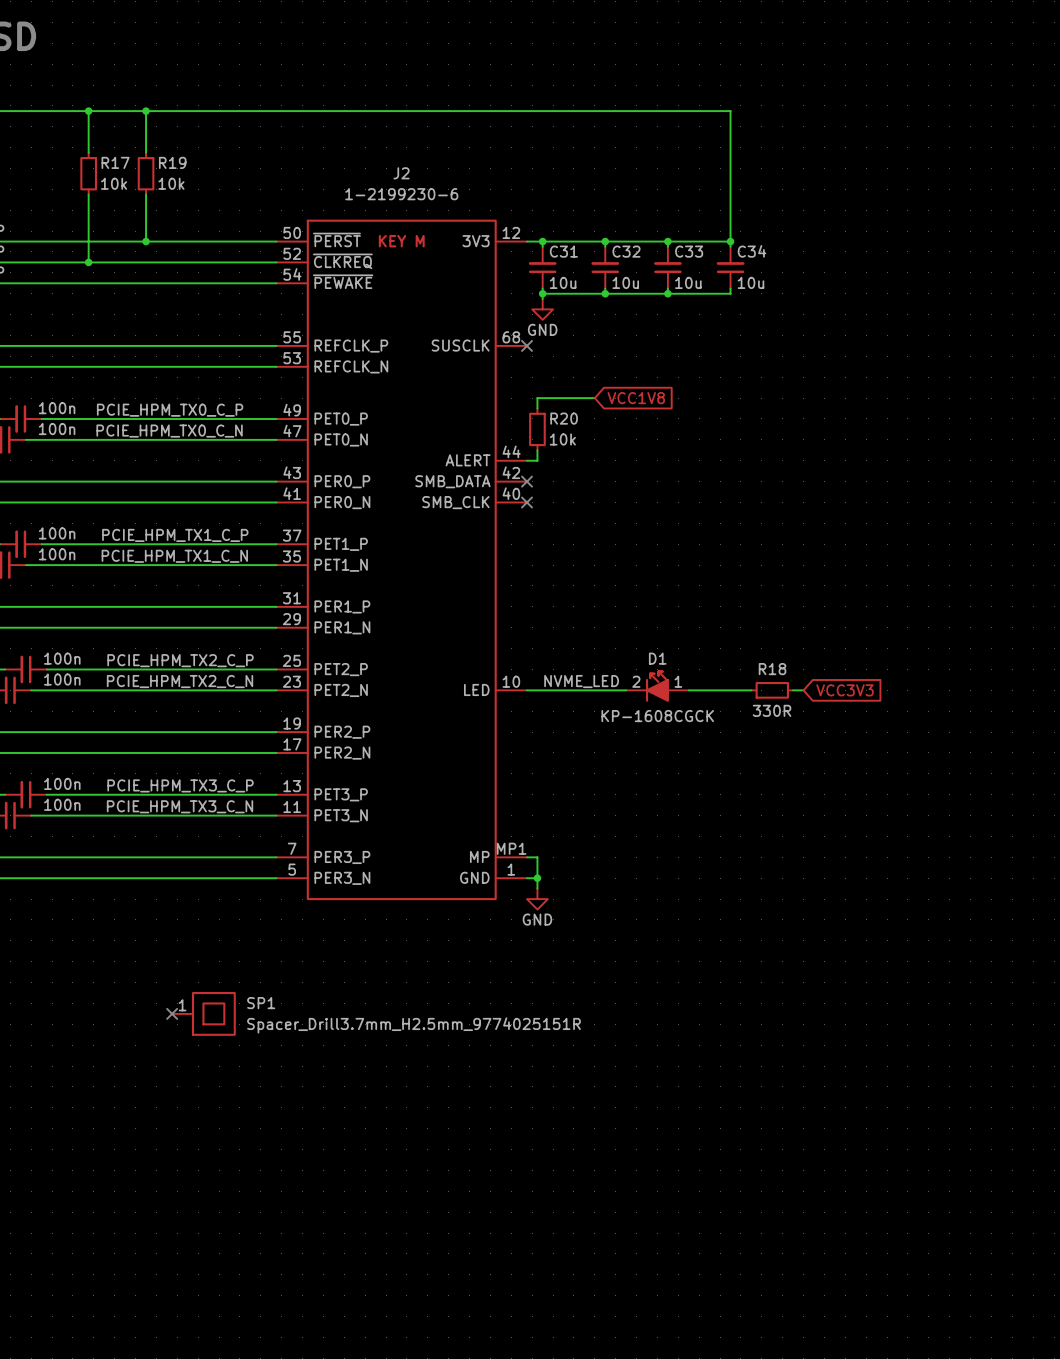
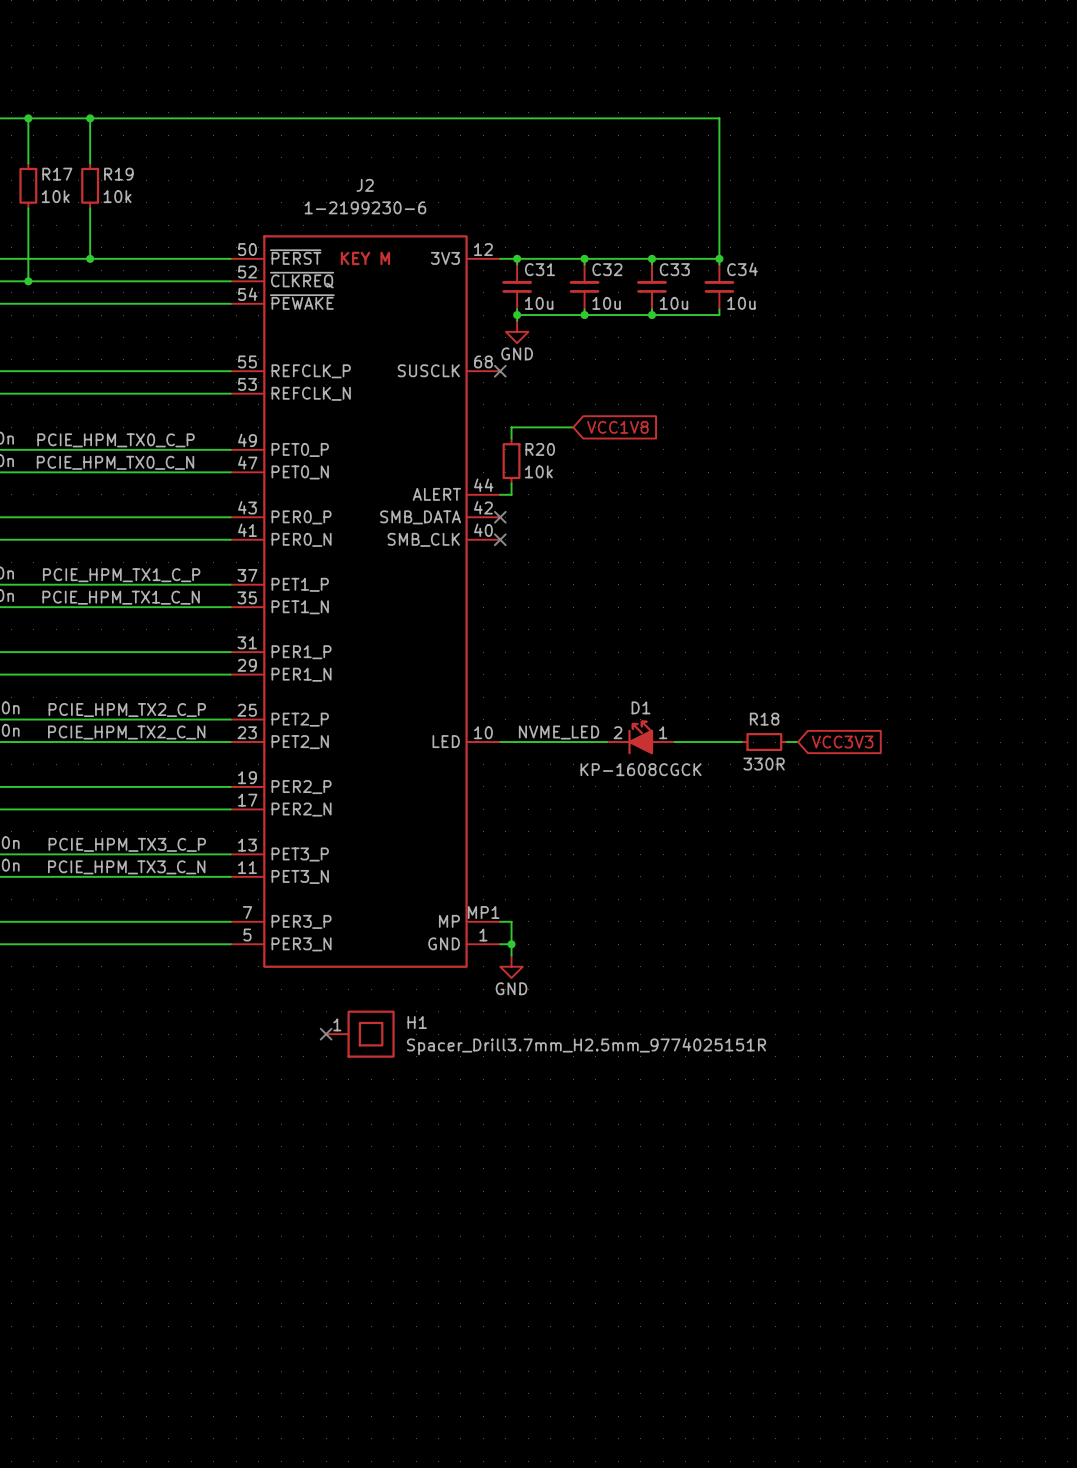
no-connect mark: none -> (326, 1034)
H1: none -> Spacer_Drill3.7mm_H2.5mm_9774025151R (360, 1034)
no-connect mark: (172, 1013) -> none
SP1: Spacer_Drill3.7mm_H2.5mm_9774025151R (203, 1013) -> none

